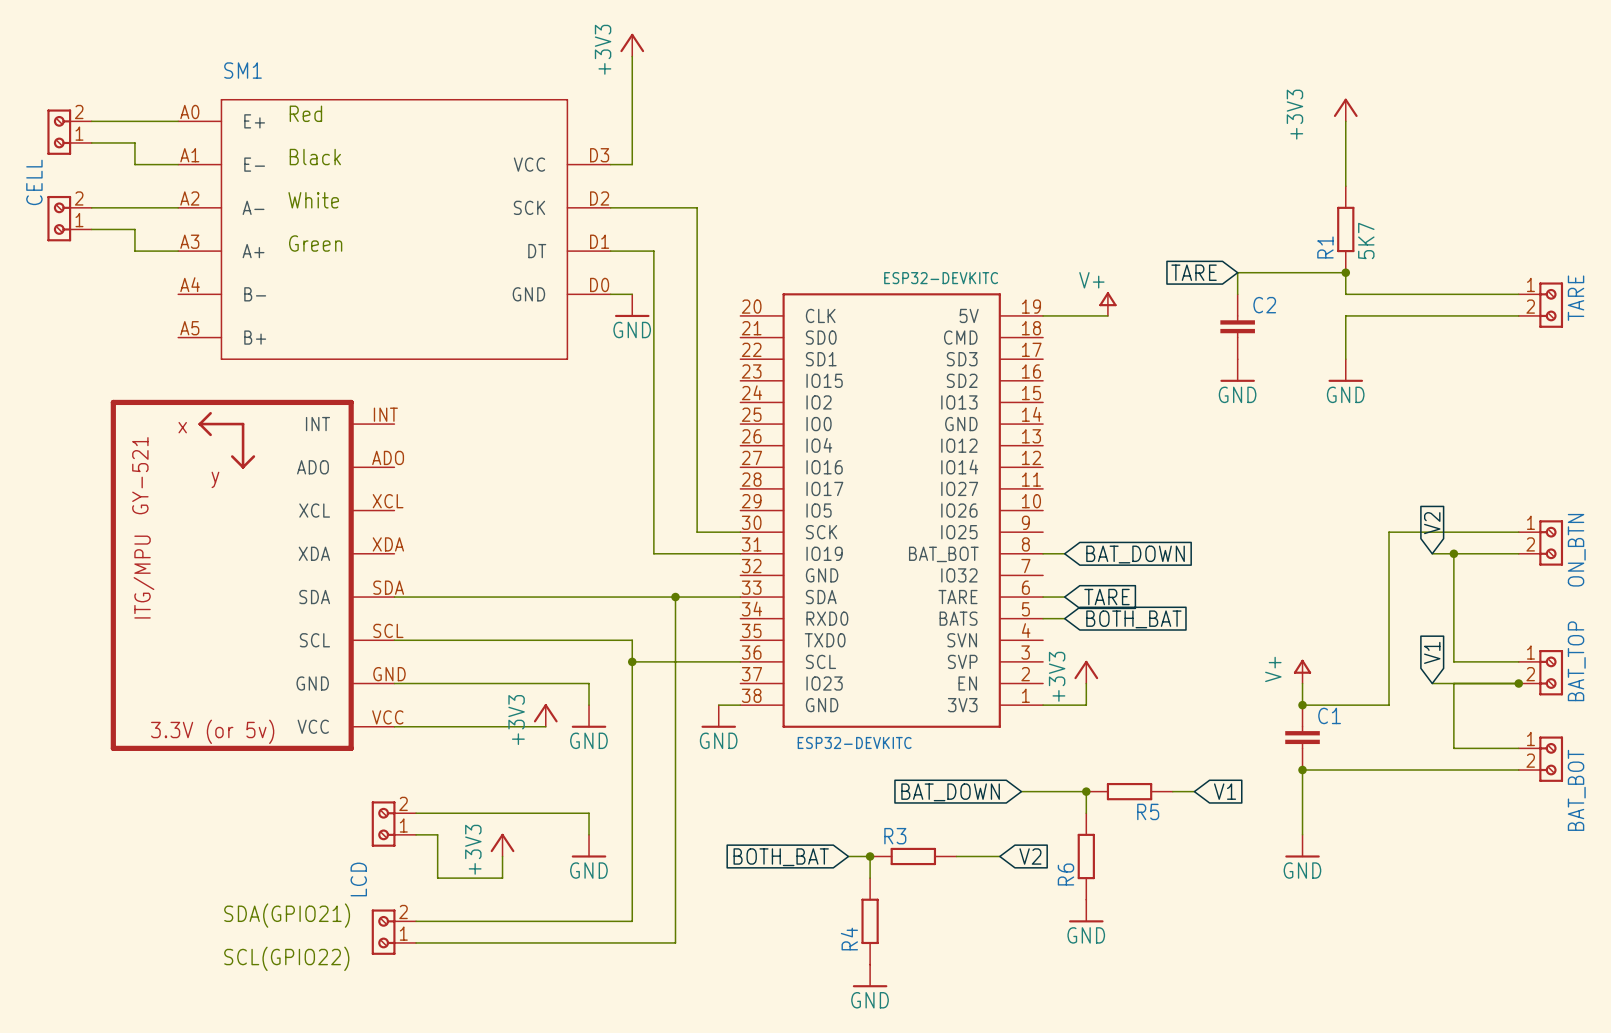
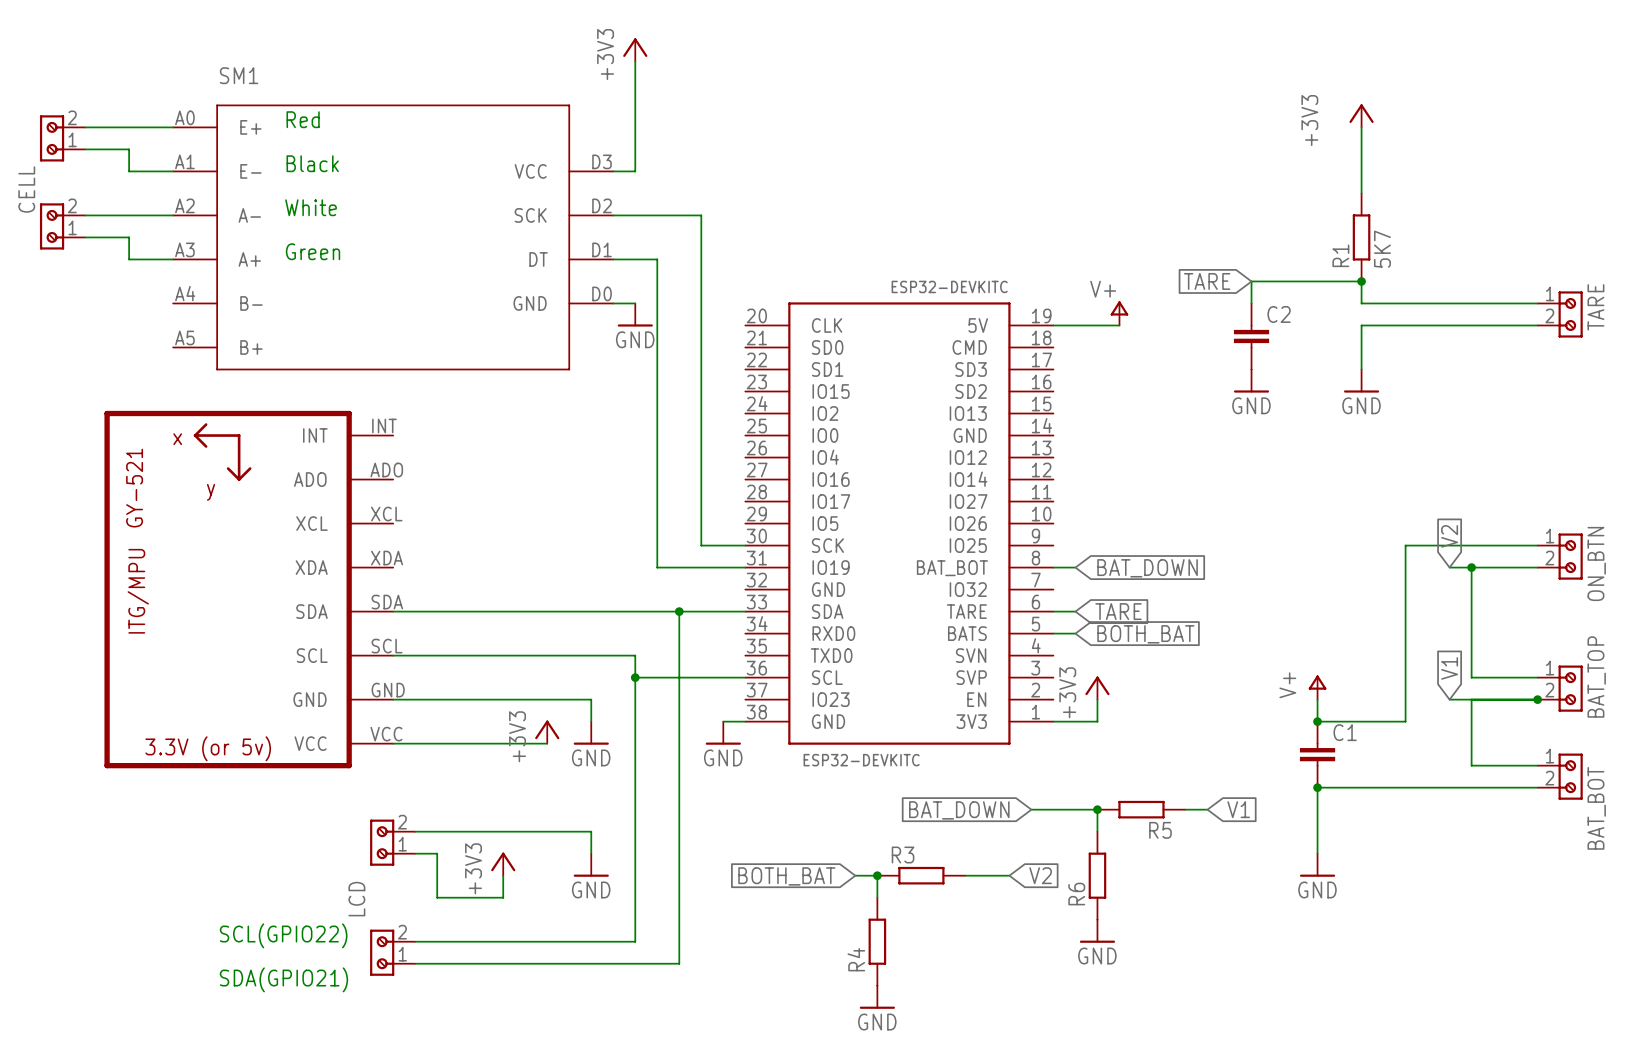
text: SDA(GPIO21) (287, 915) -> SCL(GPIO22) (283, 935)
text: SCL(GPIO22) (286, 958) -> SDA(GPIO21) (283, 979)

